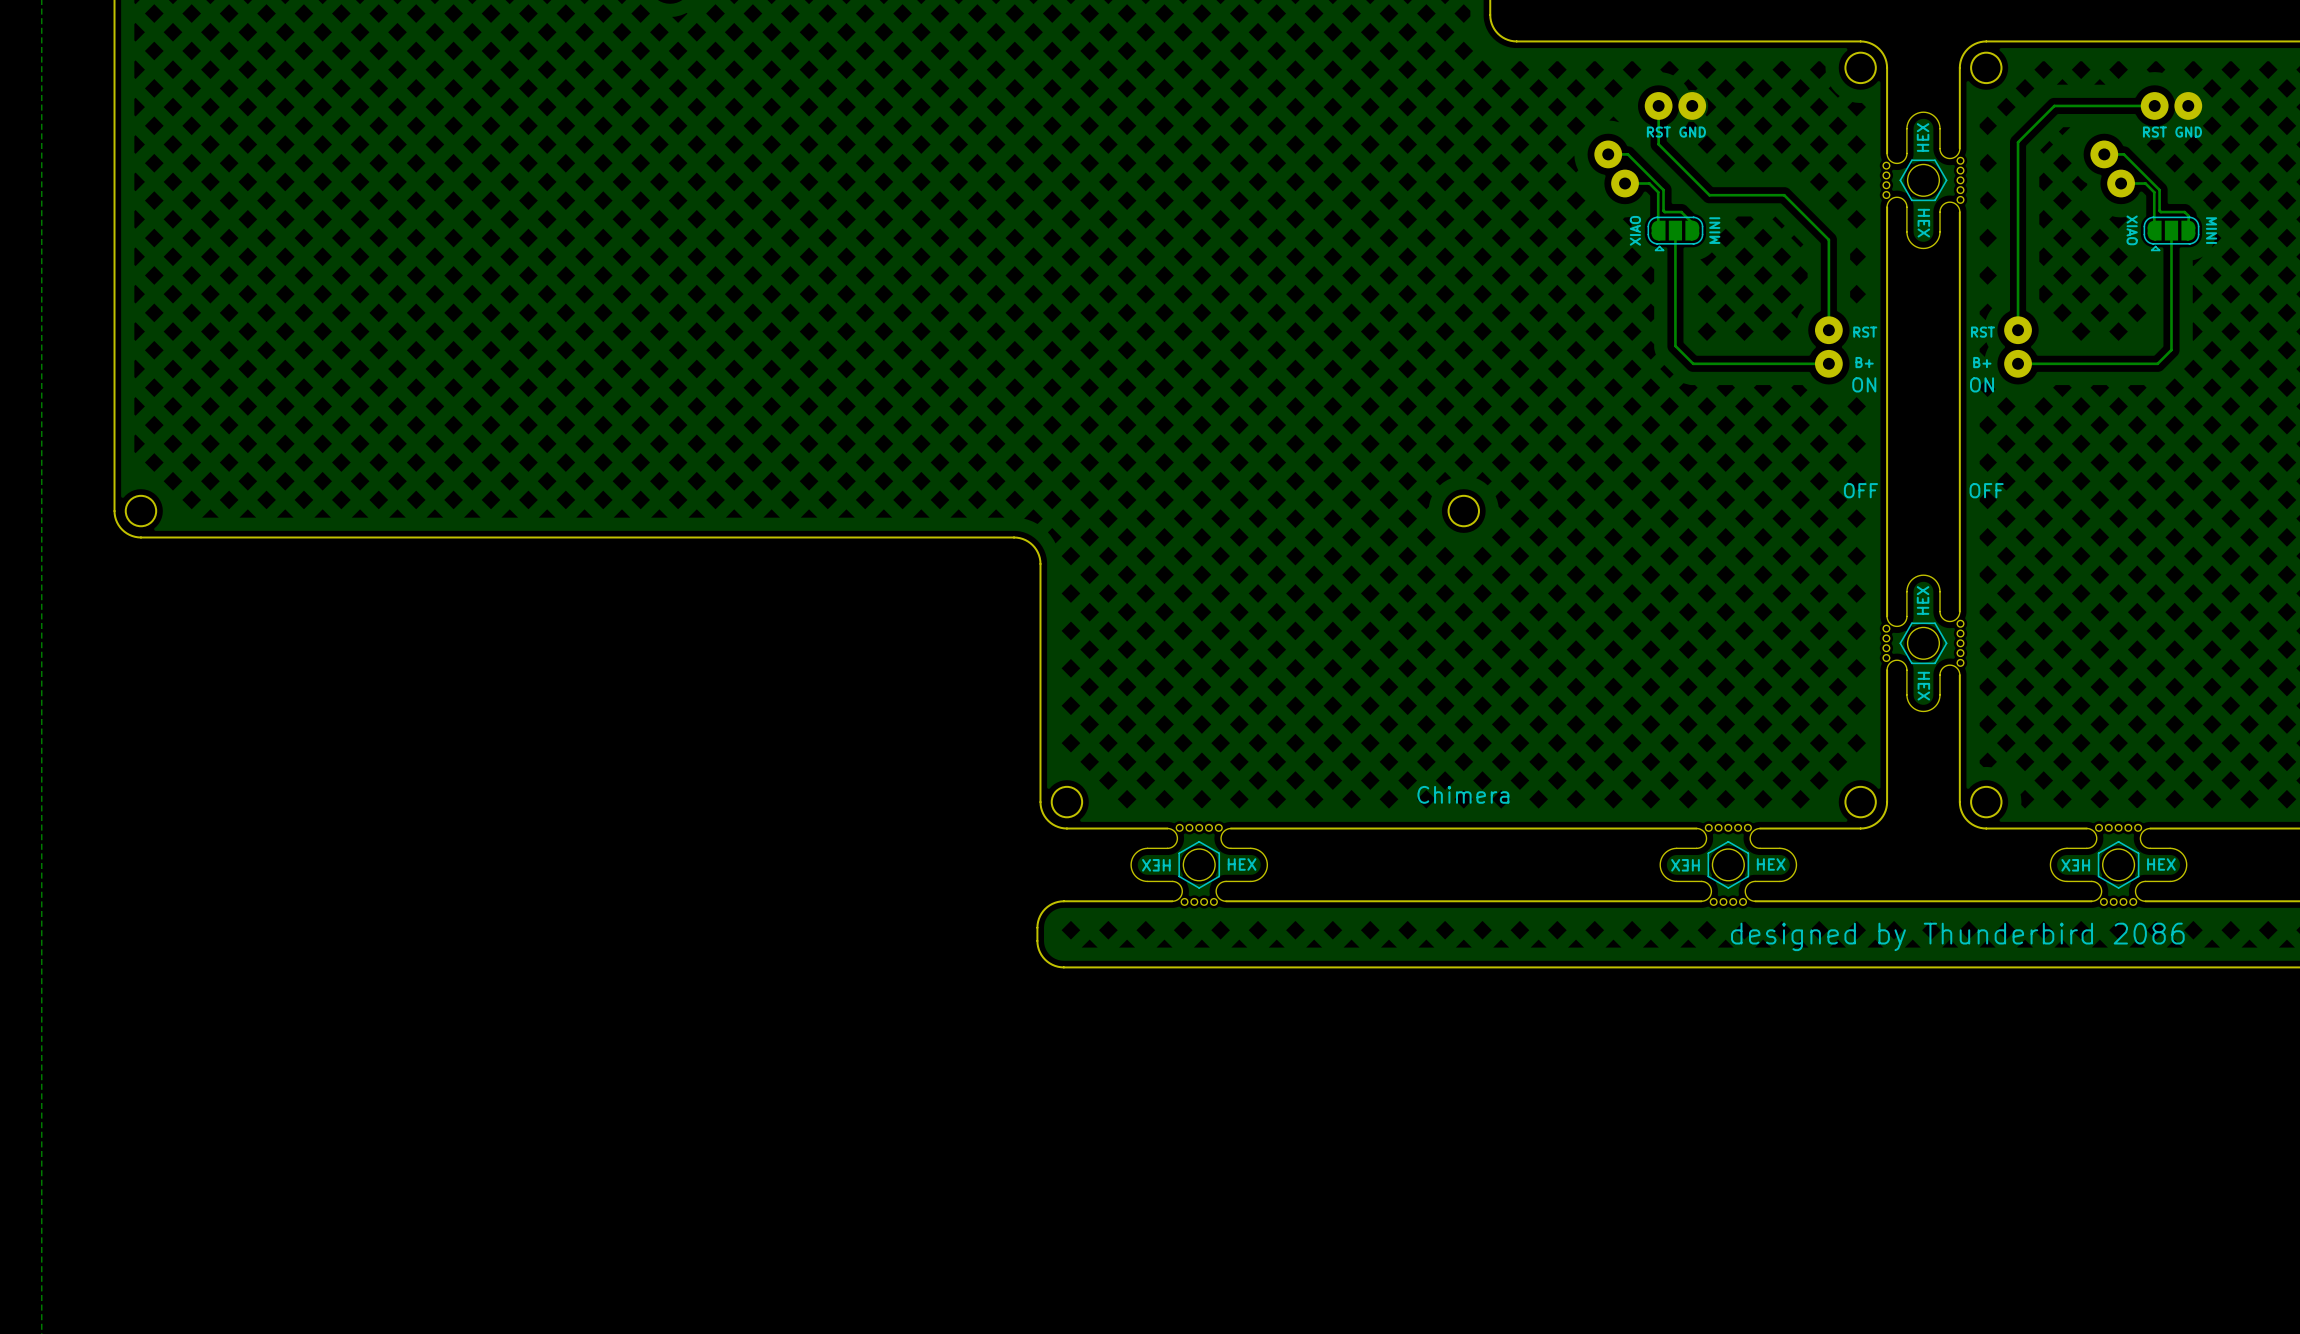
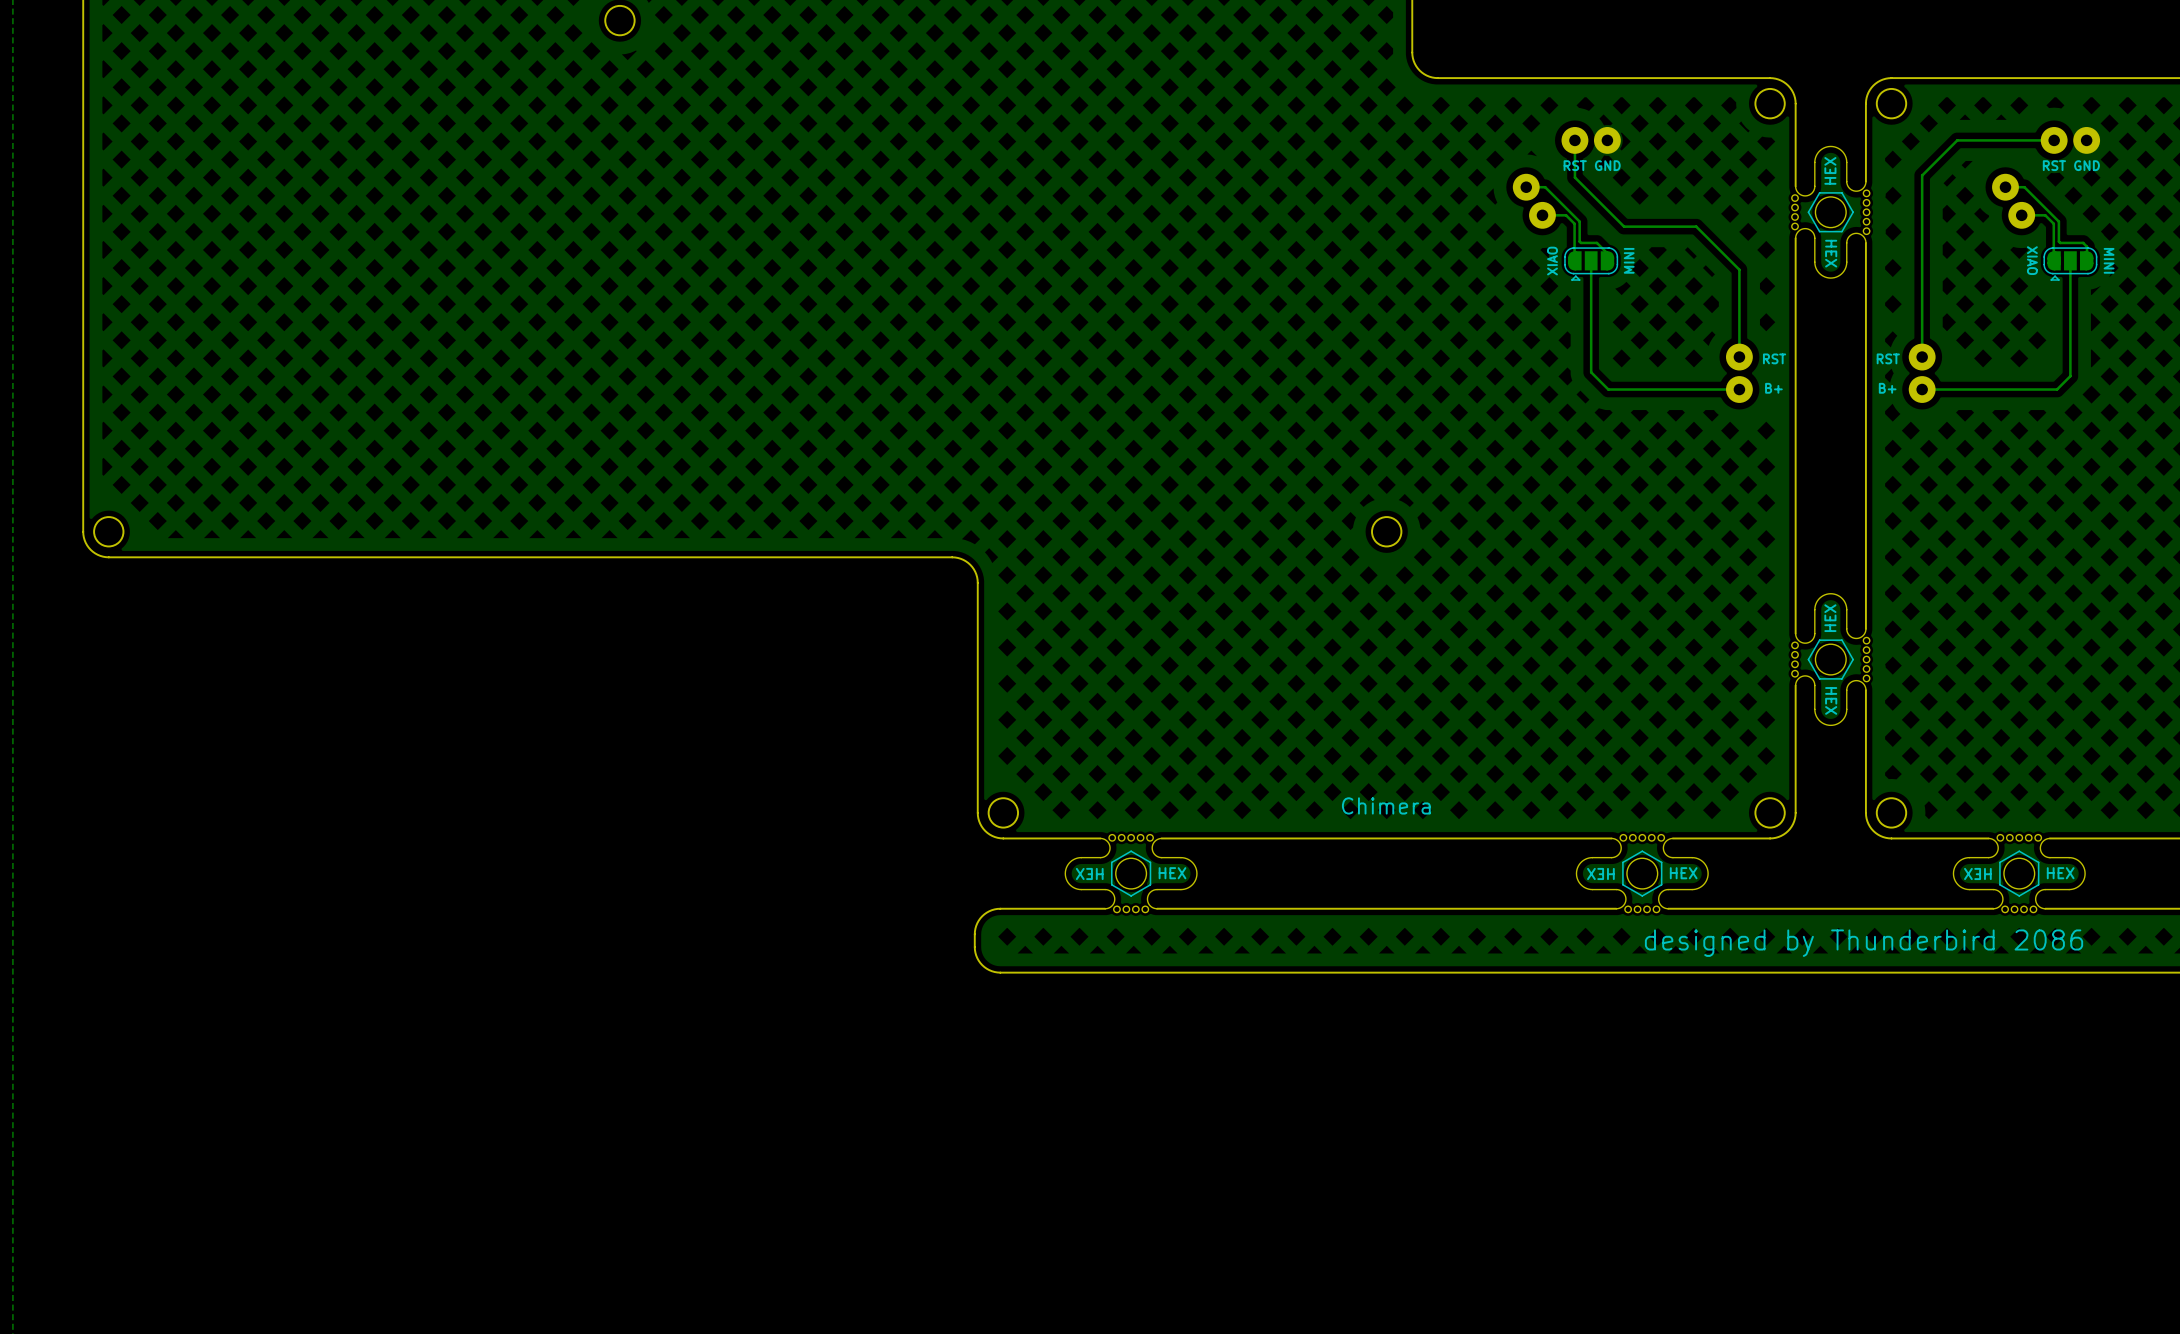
text: ON (1864, 384) -> none
text: ON (1982, 384) -> none
text: OFF (1860, 490) -> none
text: OFF (1986, 490) -> none

